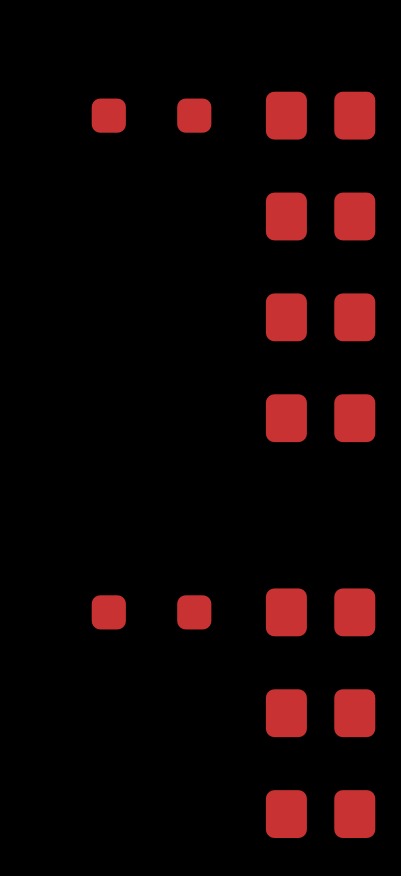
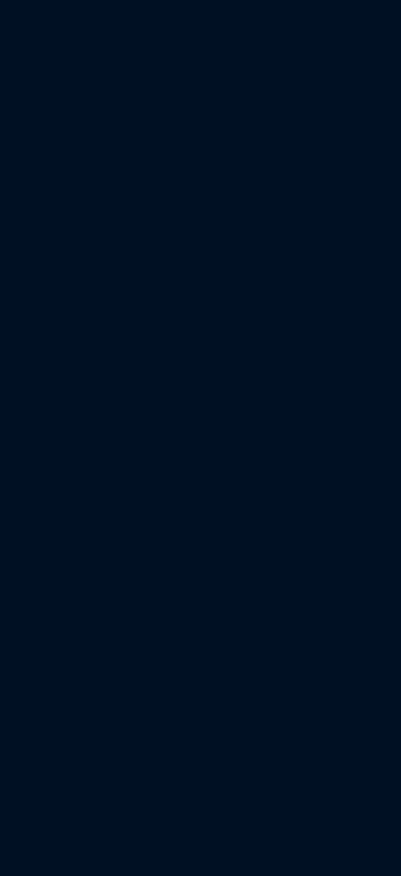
part: (151, 115) -> none
part: (320, 115) -> none
part: (320, 216) -> none
part: (320, 317) -> none
part: (320, 418) -> none
part: (151, 612) -> none
part: (320, 612) -> none
part: (320, 713) -> none
part: (320, 814) -> none

